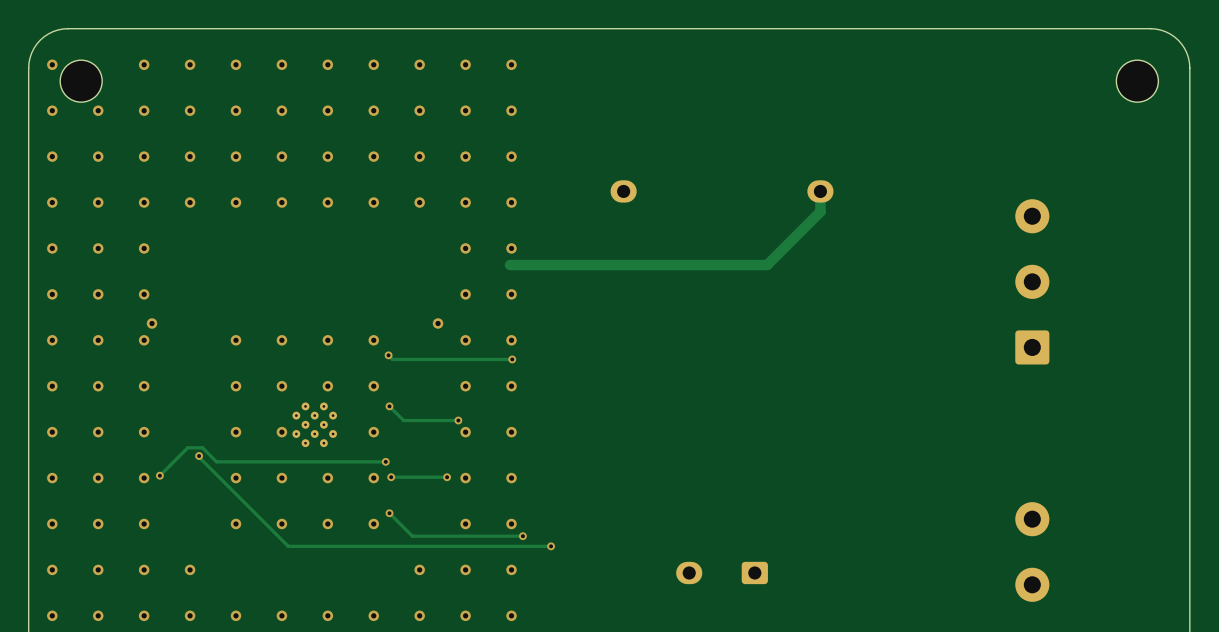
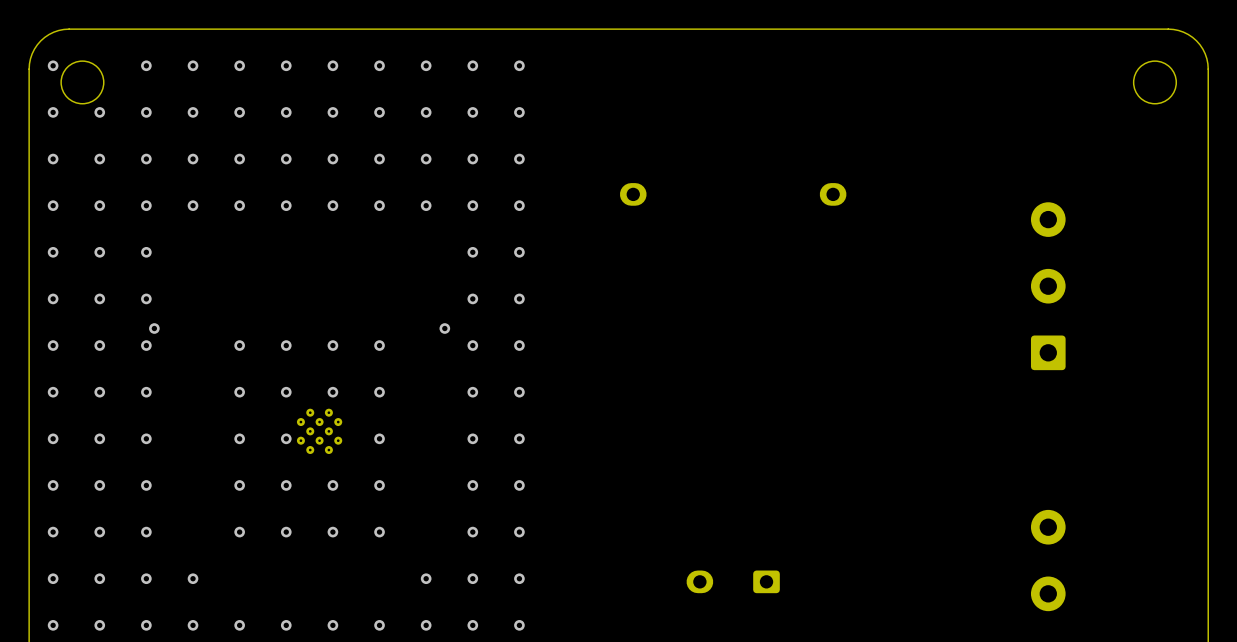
track: (820, 191) (820, 211) (767, 265) (510, 265) -> none
track: (388, 355) (392, 359) (512, 359) -> none
via: (388, 355) -> none
via: (512, 359) -> none
track: (389, 406) (403, 420) (458, 420) -> none
via: (389, 406) -> none
via: (458, 420) -> none
track: (199, 456) (288, 546) (551, 546) -> none
via: (199, 456) -> none
track: (385, 461) (216, 461) (202, 447) (187, 447) (159, 475) -> none
via: (385, 461) -> none
via: (159, 475) -> none
via: (391, 477) -> none
track: (447, 477) (391, 477) -> none
via: (447, 477) -> none
track: (389, 513) (412, 536) (522, 536) -> none
via: (389, 513) -> none
via: (522, 536) -> none
via: (551, 546) -> none

